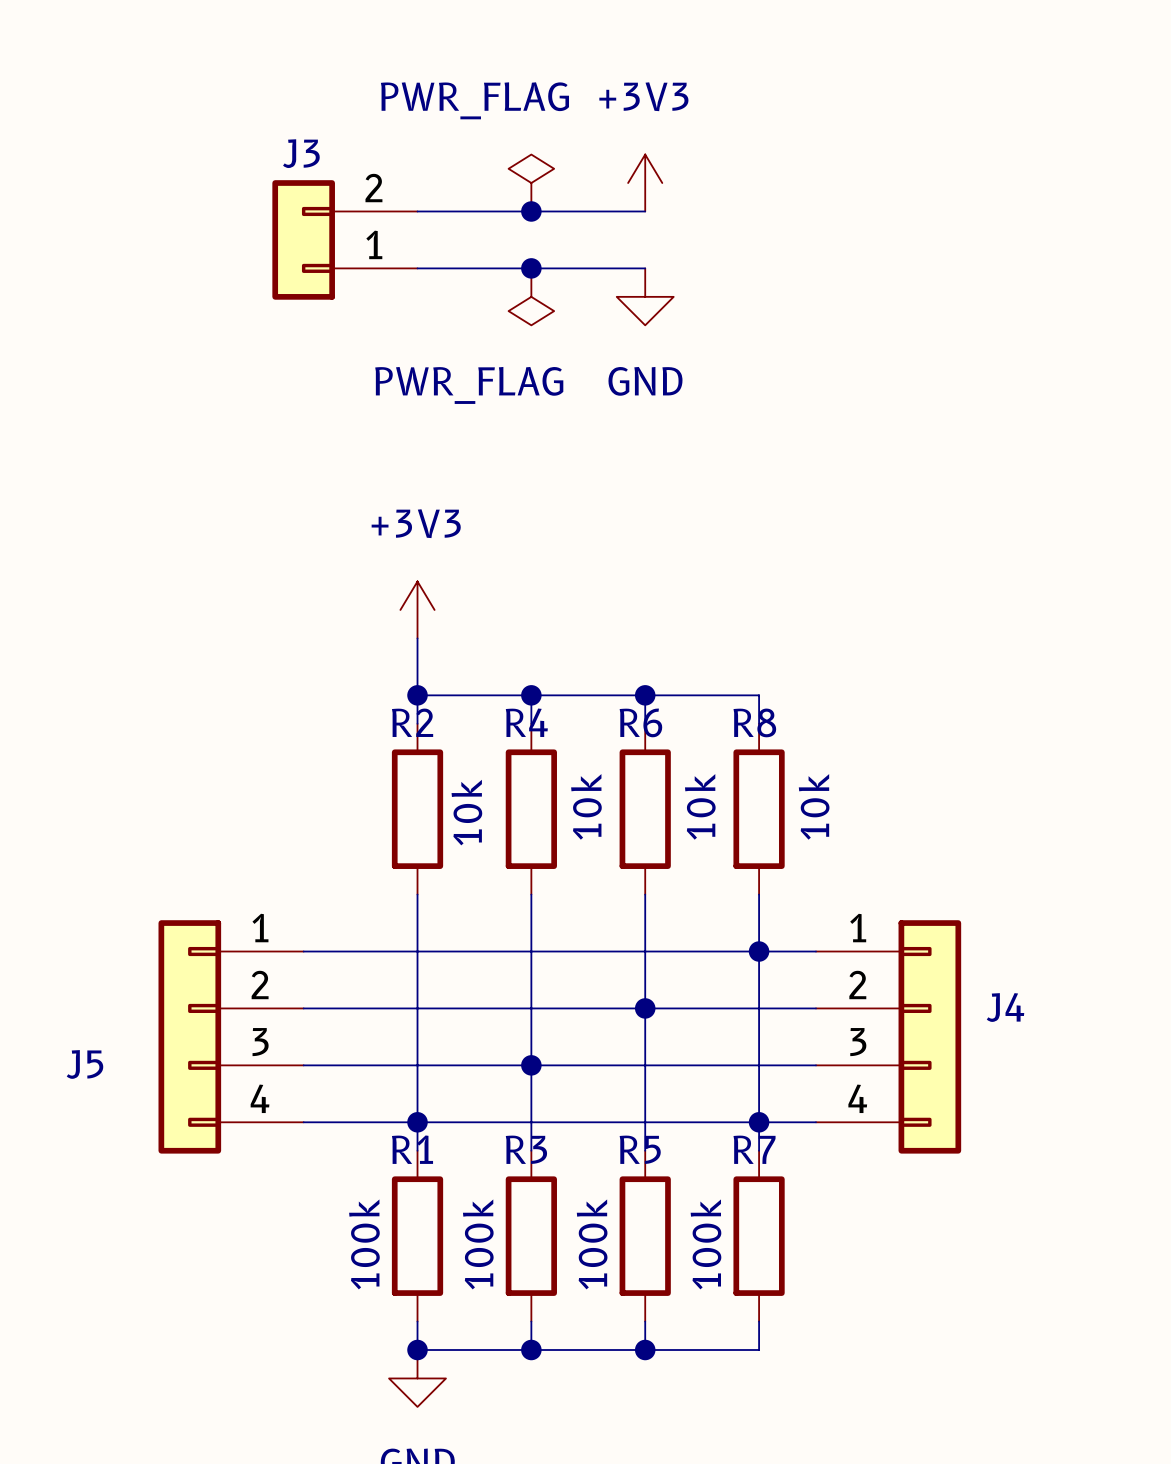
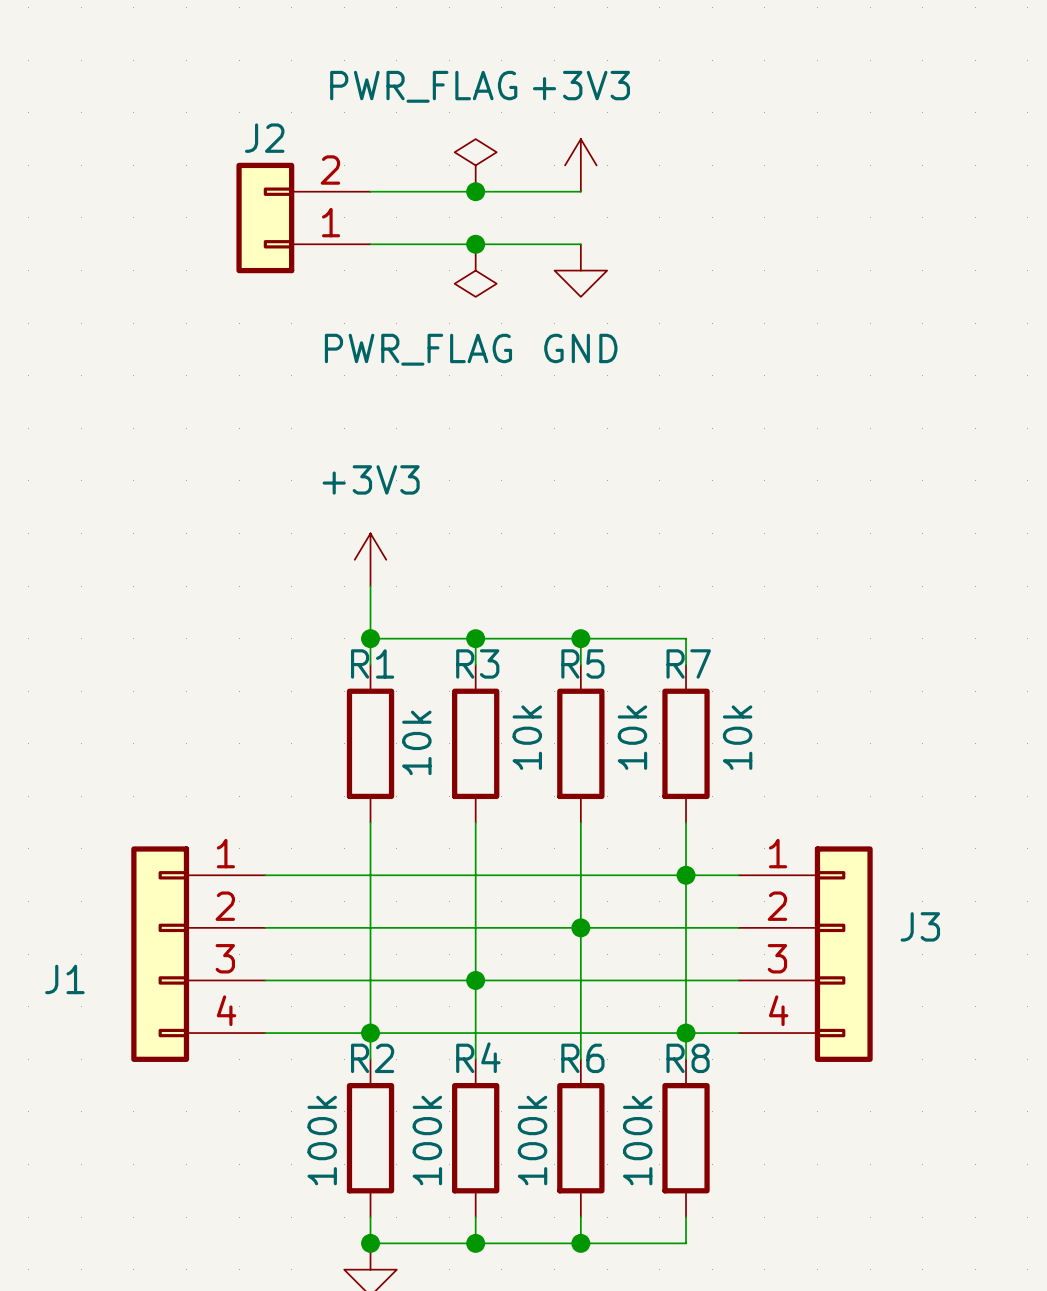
J3 name: J3 (301, 153) -> J2 (264, 138)
R2 name: R2 (412, 722) -> R1 (372, 663)
R4 name: R4 (526, 722) -> R3 (477, 663)
R6 name: R6 (640, 722) -> R5 (582, 663)
R8 name: R8 (754, 722) -> R7 (688, 663)
J4 name: J4 (1005, 1007) -> J3 (920, 926)
J5 name: J5 (84, 1064) -> J1 (64, 979)
R1 name: R1 (412, 1149) -> R2 (372, 1058)
R3 name: R3 (526, 1149) -> R4 (478, 1057)
R5 name: R5 (640, 1149) -> R6 (582, 1058)
R7 name: R7 (754, 1149) -> R8 (688, 1058)

